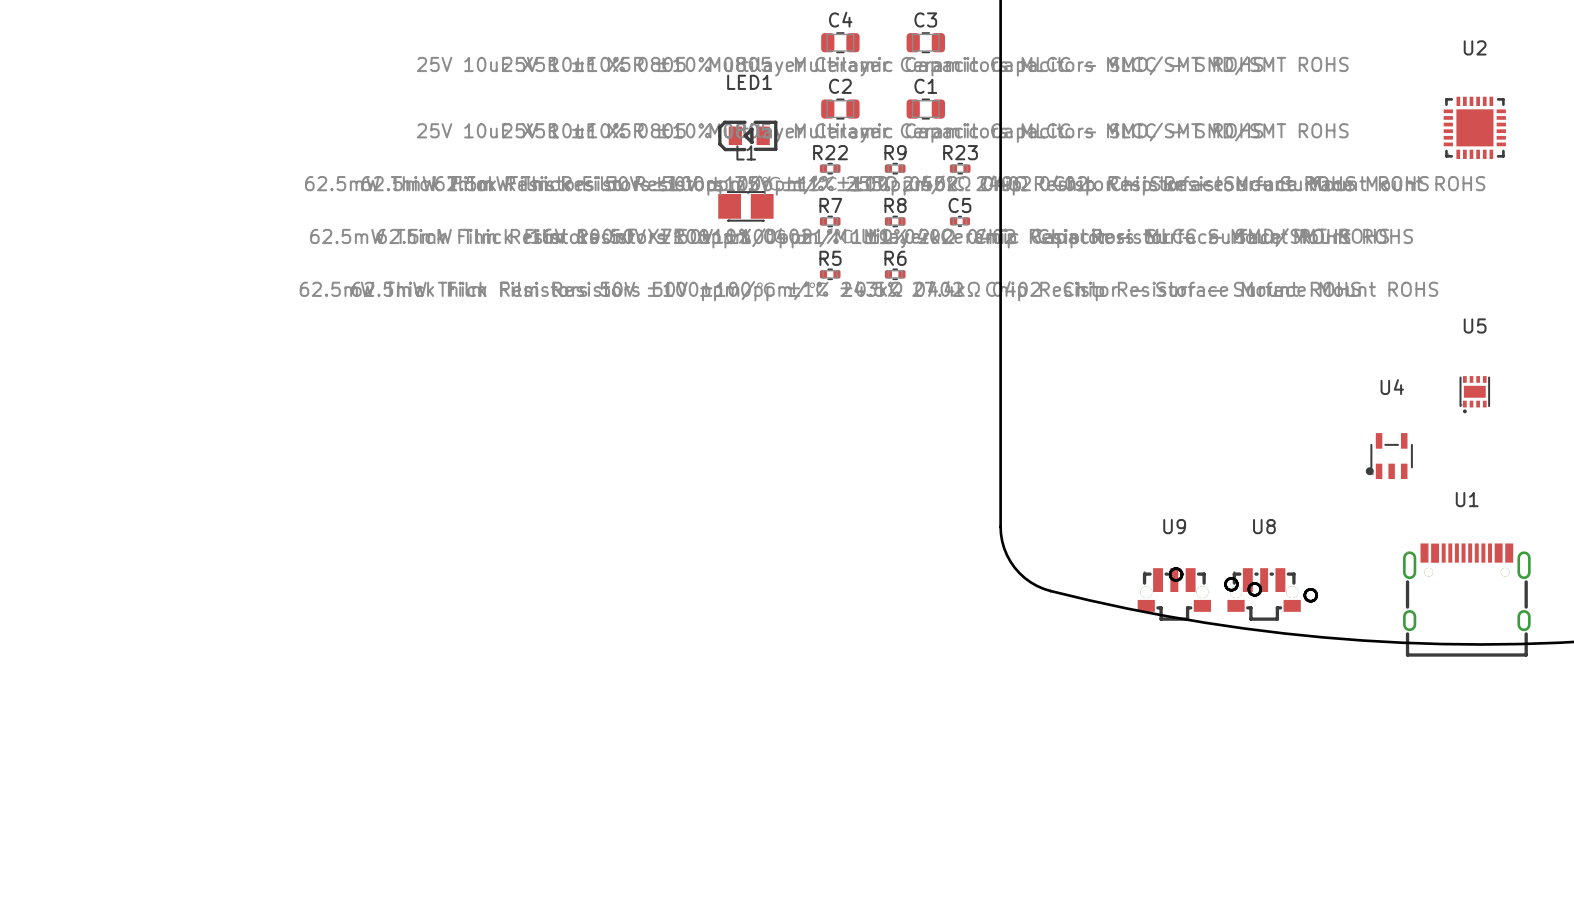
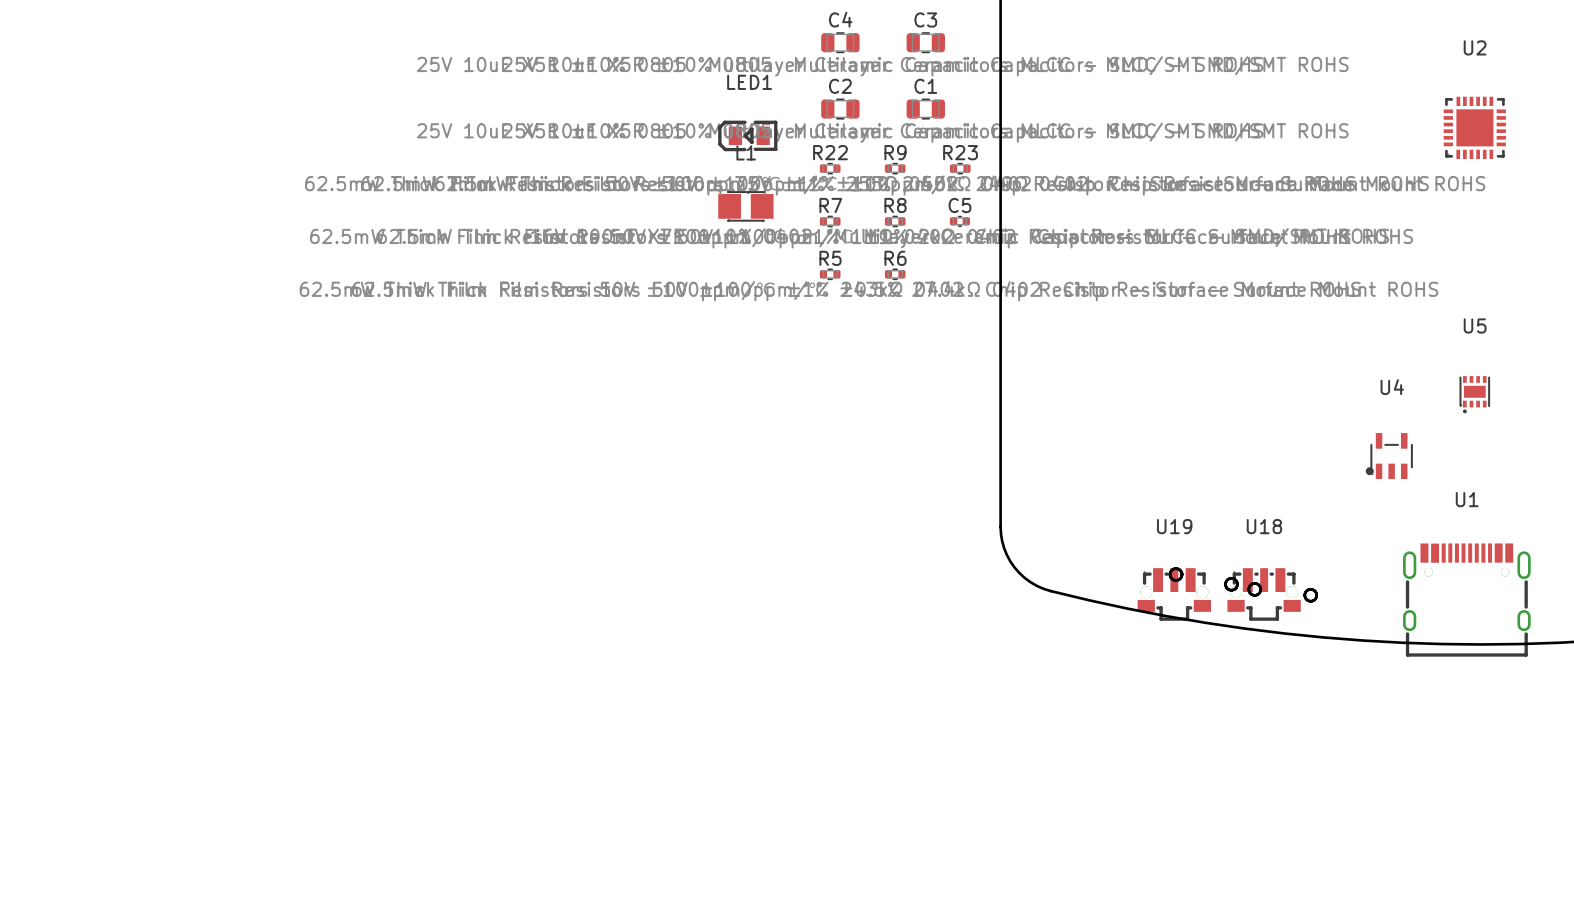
U9 name: U9 (1174, 526) -> U19 (1174, 526)
U8 name: U8 (1264, 526) -> U18 (1264, 526)

